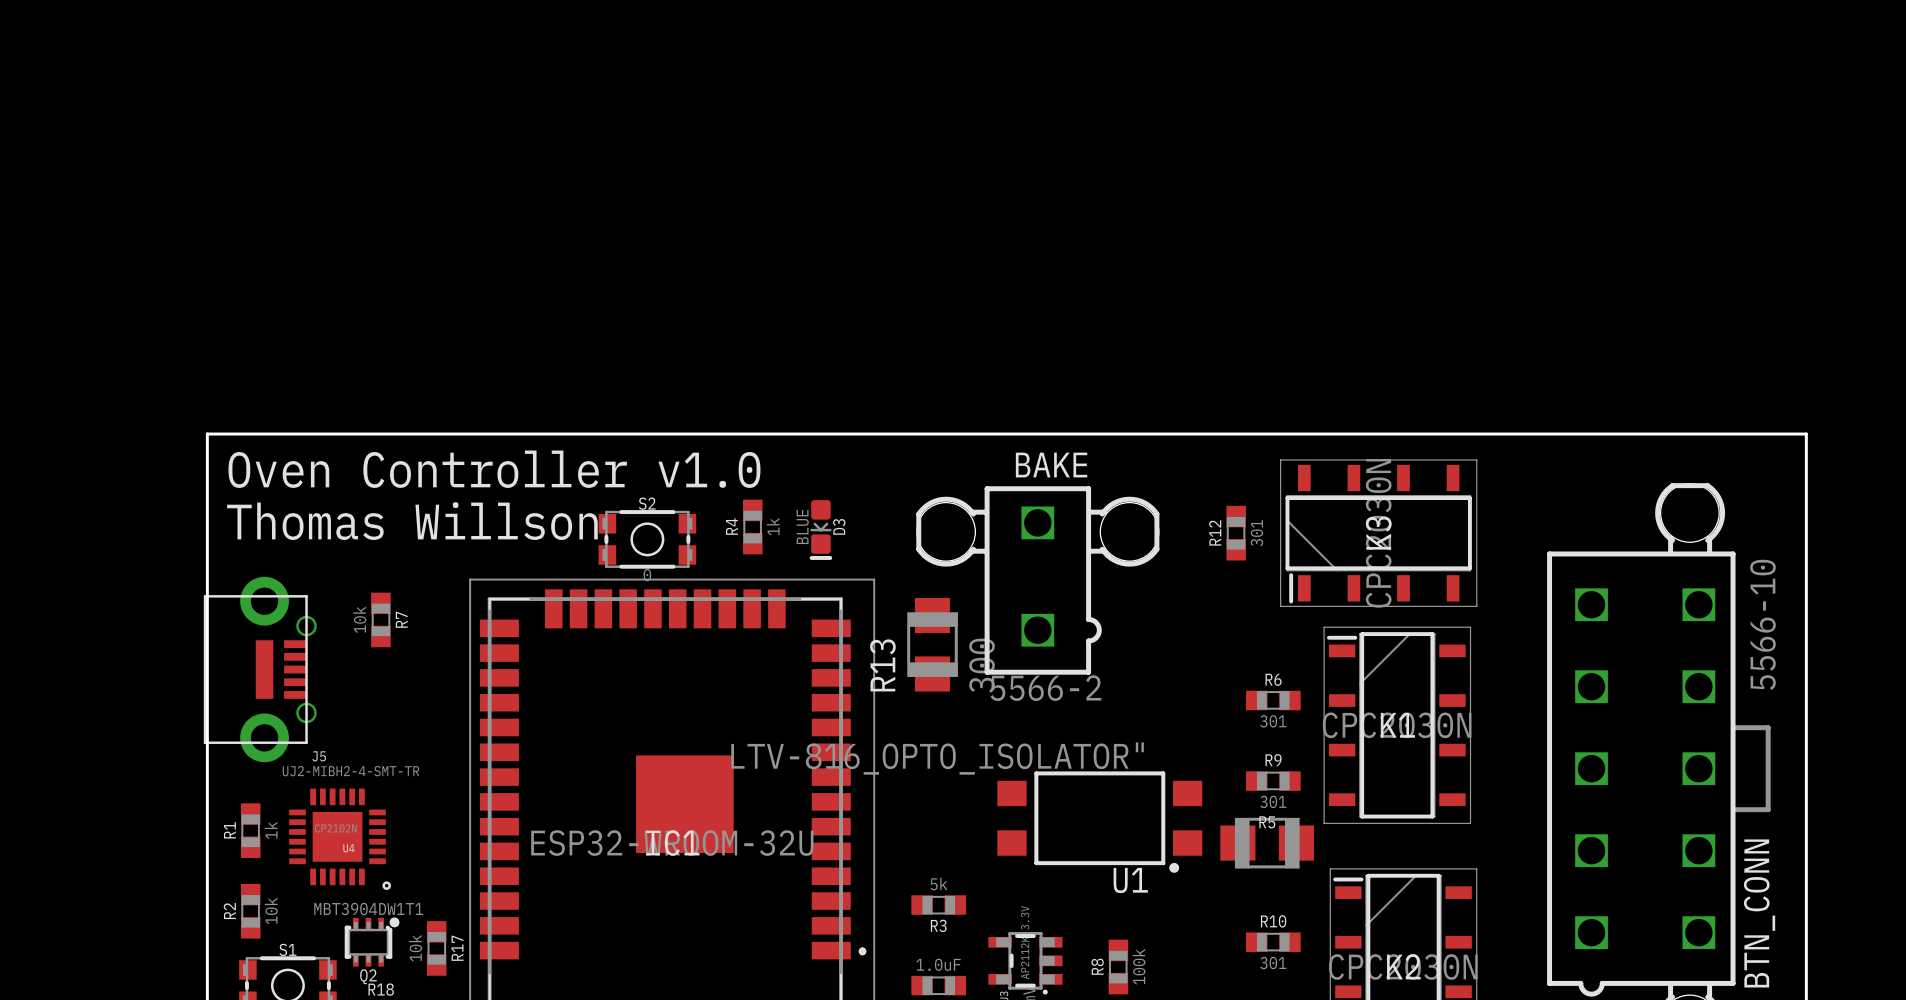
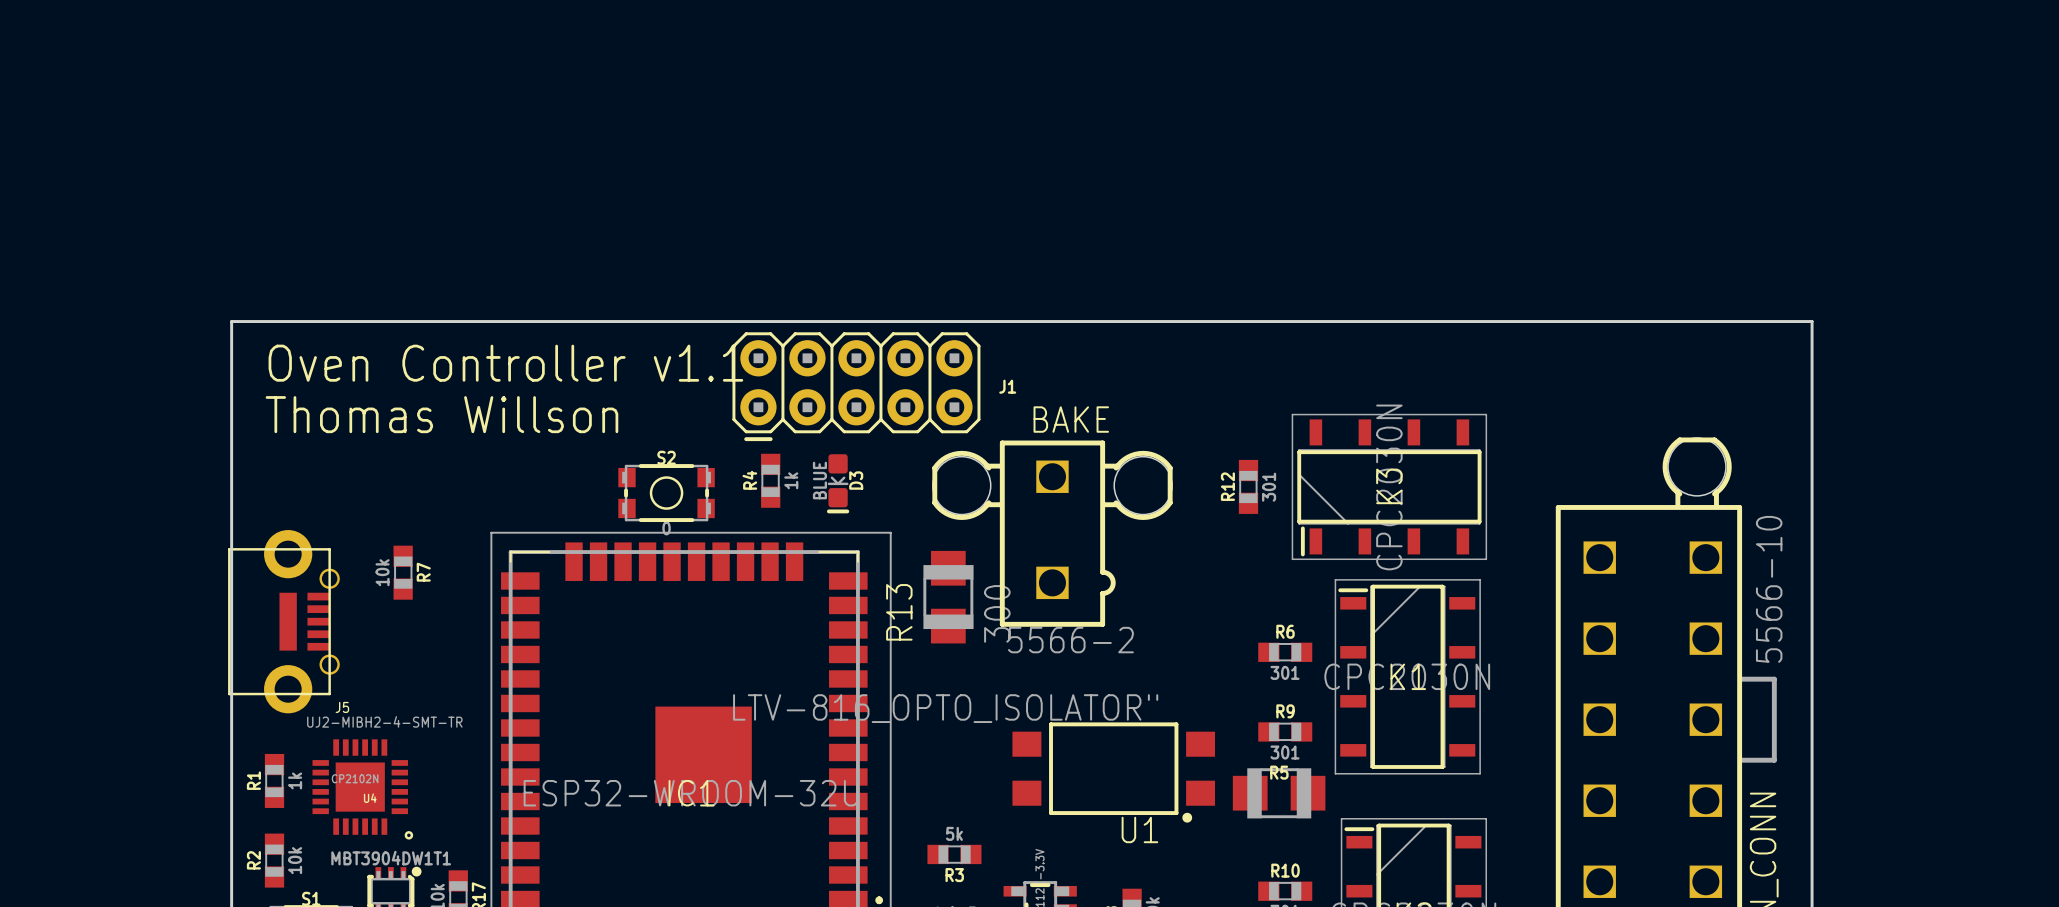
text: none -> Oven Controller v1.1 (505, 363)
J1: none -> (856, 386)
board edge: (207, 434) (1806, 434) -> (231, 388) (231, 321) (1812, 321) (1812, 388)
text: Oven Controller v1.0 (494, 469) -> Thomas Willson (441, 414)
text: Thomas Willson (412, 521) -> none

